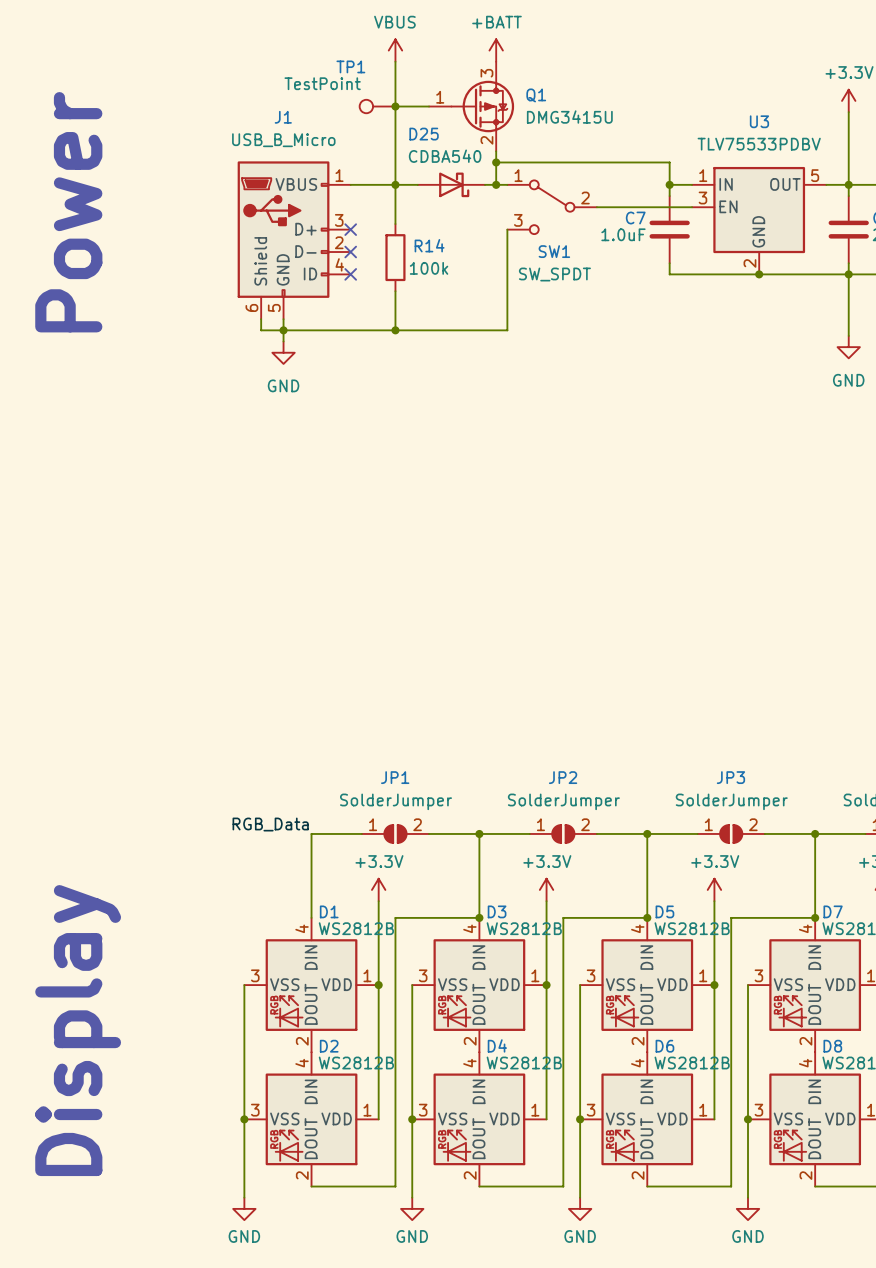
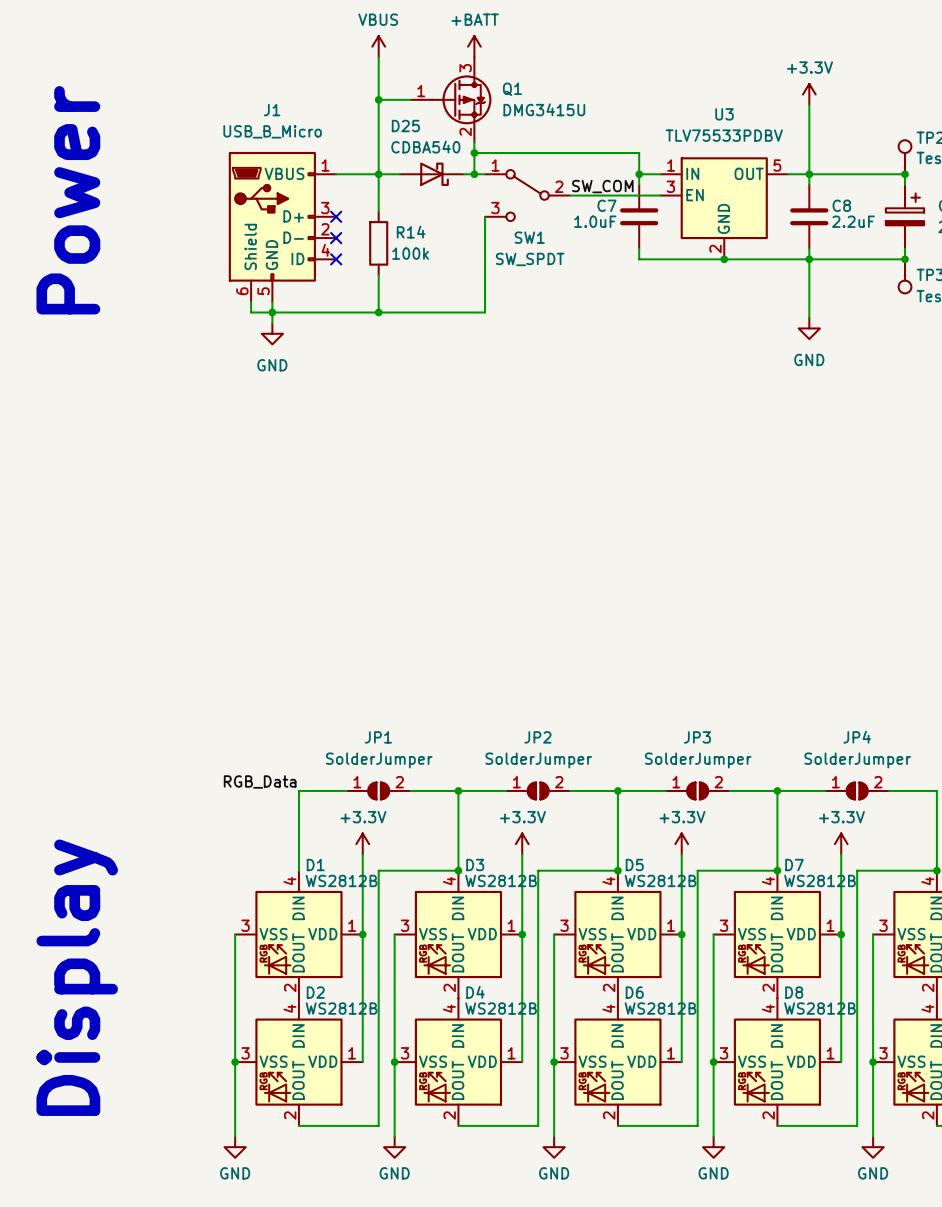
TP1: TestPoint (377, 106) -> none
label: none -> SW_COM (602, 186)

